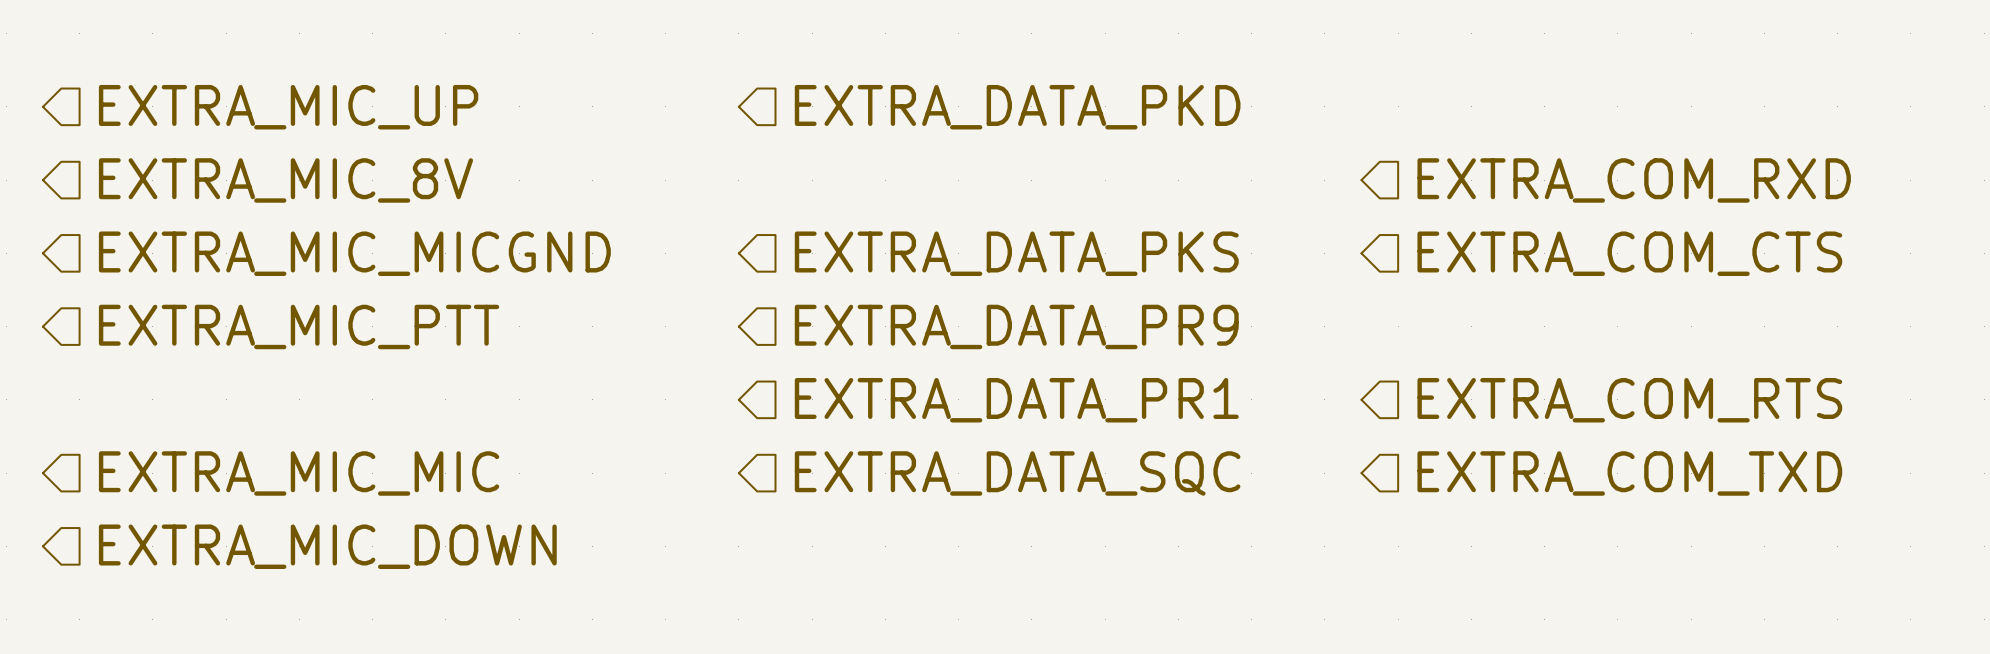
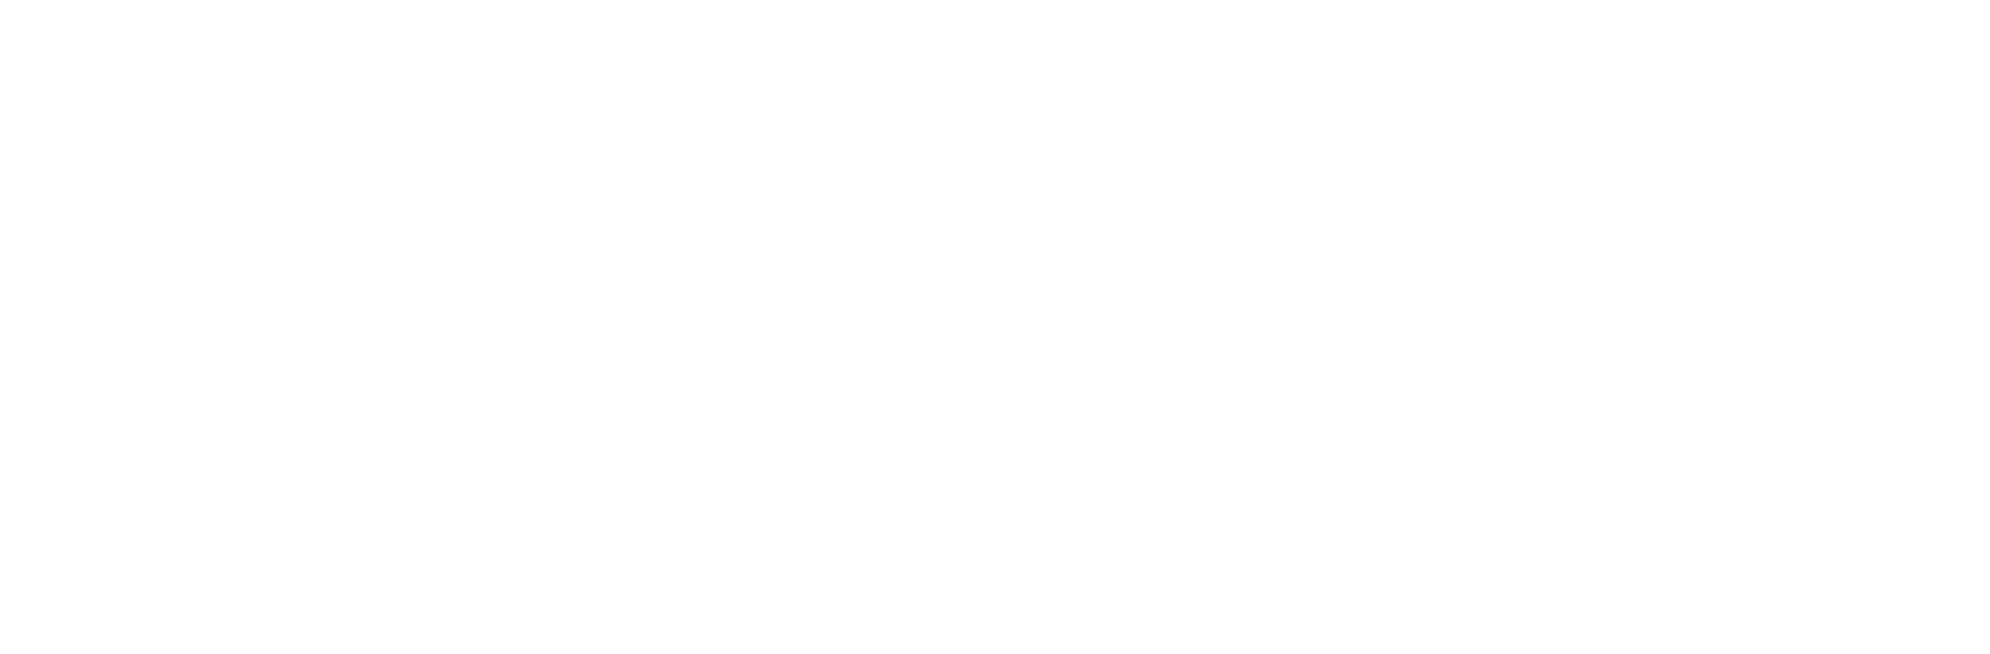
hierarchical label: EXTRA_MIC_UP (288, 107) -> none
hierarchical label: EXTRA_DATA_PKD (1017, 107) -> none
hierarchical label: EXTRA_MIC_8V (285, 180) -> none
hierarchical label: EXTRA_COM_RXD (1634, 180) -> none
hierarchical label: EXTRA_MIC_MICGND (354, 253) -> none
hierarchical label: EXTRA_DATA_PKS (1016, 253) -> none
hierarchical label: EXTRA_COM_CTS (1629, 253) -> none
hierarchical label: EXTRA_MIC_PTT (299, 326) -> none
hierarchical label: EXTRA_DATA_PR9 (1016, 326) -> none
hierarchical label: EXTRA_DATA_PR1 (1016, 400) -> none
hierarchical label: EXTRA_COM_RTS (1629, 400) -> none
hierarchical label: EXTRA_MIC_MIC (299, 473) -> none
hierarchical label: EXTRA_DATA_SQC (1017, 473) -> none
hierarchical label: EXTRA_COM_TXD (1629, 473) -> none
hierarchical label: EXTRA_MIC_DOWN (327, 546) -> none

